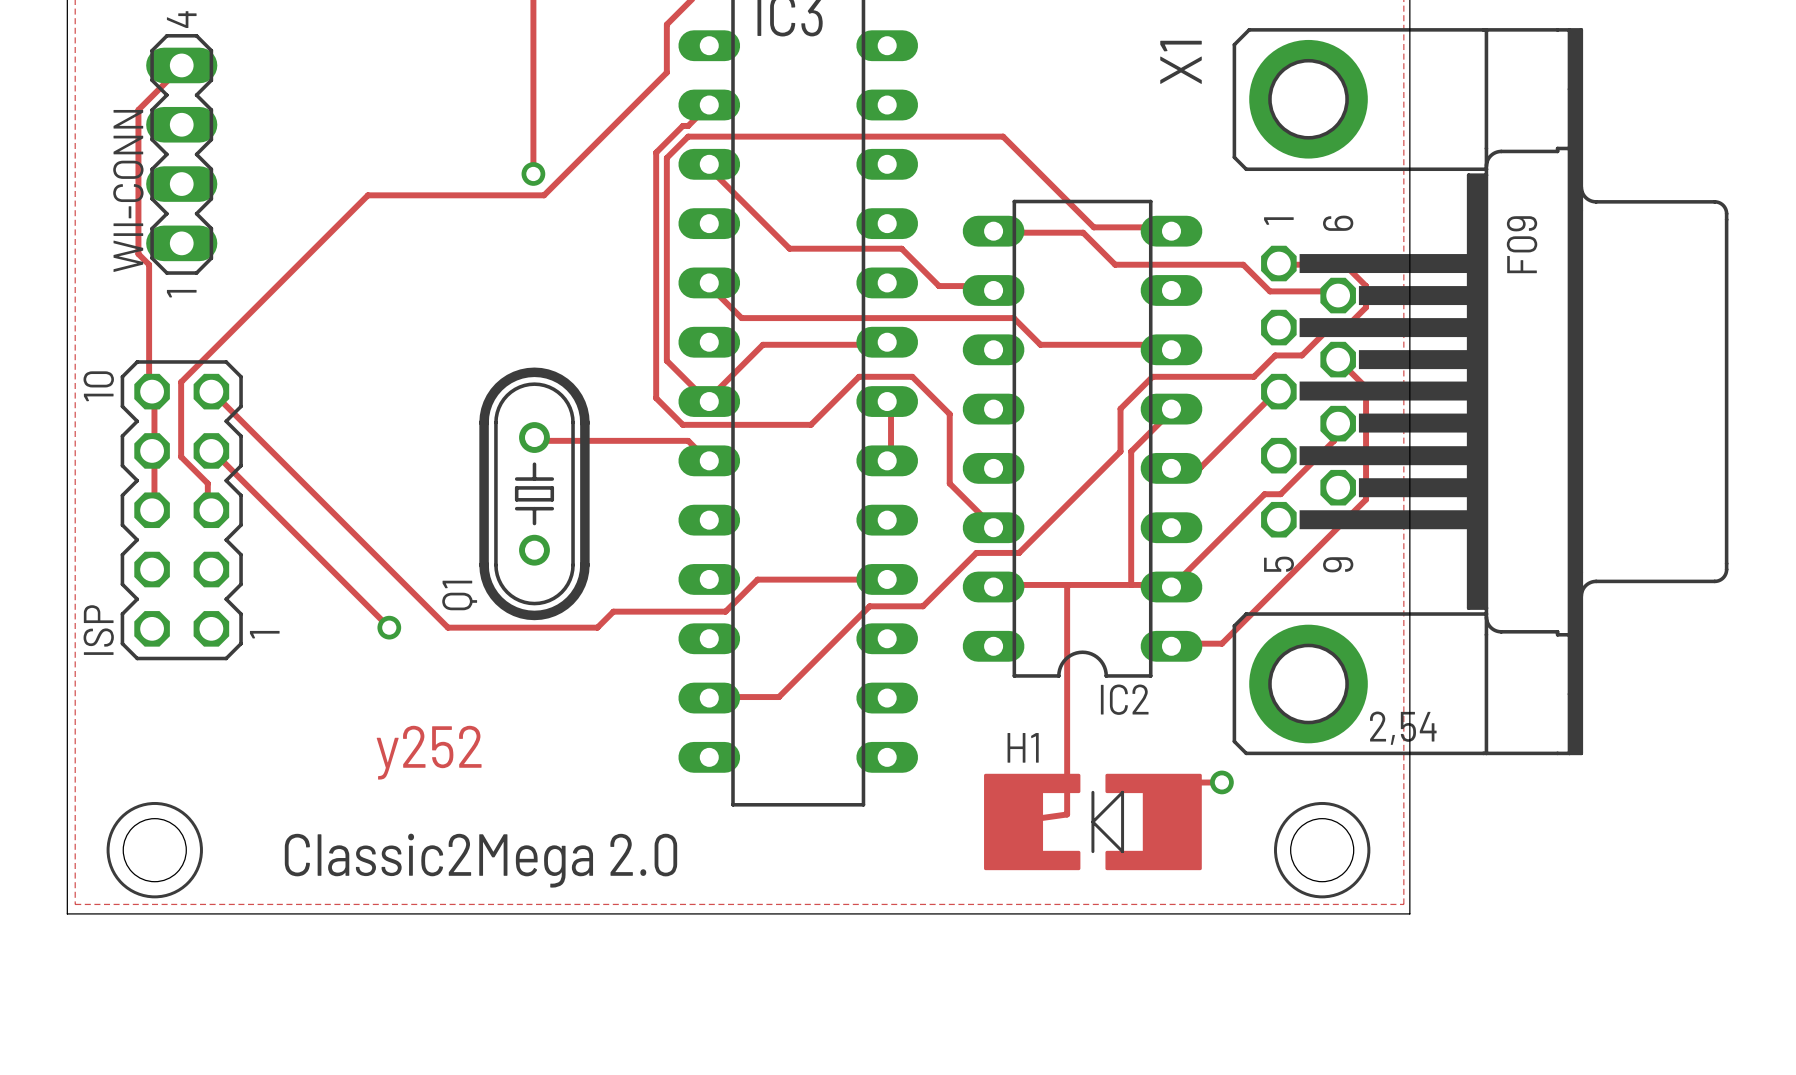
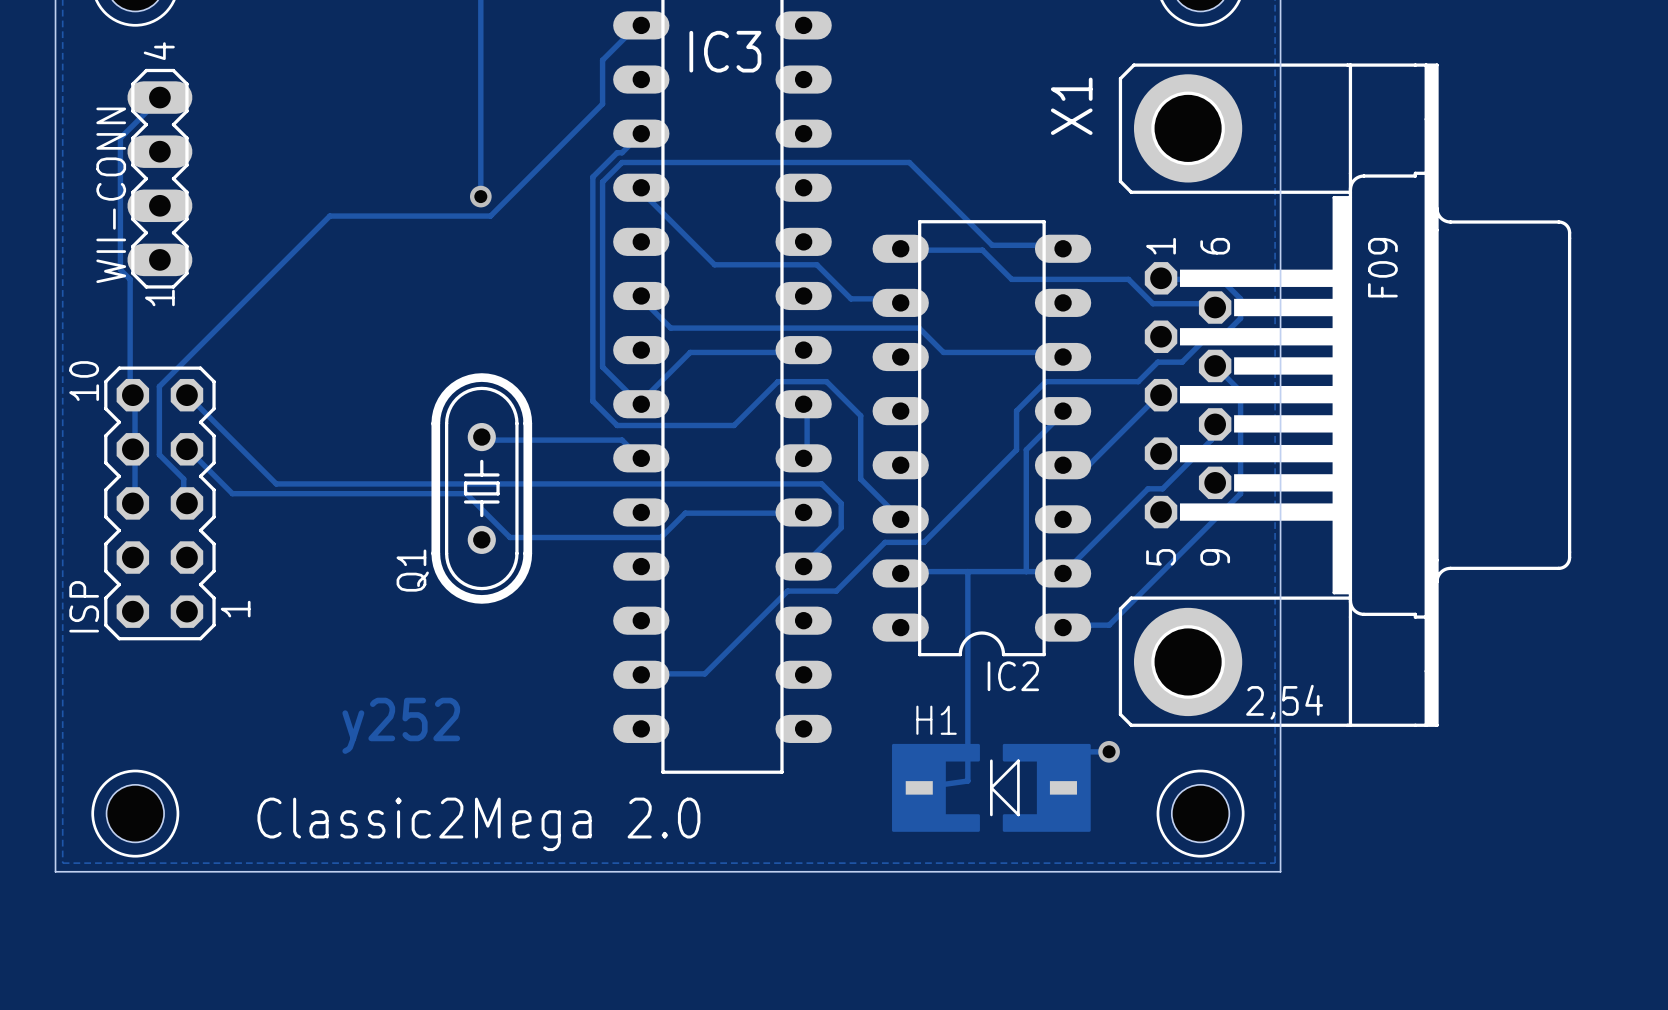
track: (309, 488) (448, 627) (597, 627) (613, 611) (725, 611) (757, 579) (887, 579) -> (276, 483) (821, 483) (841, 503) (841, 527) (807, 561)
track: (261, 499) (389, 627) -> (232, 493) (466, 493) (510, 537) (661, 537) (685, 513) (802, 513)
via: (389, 627) -> none

